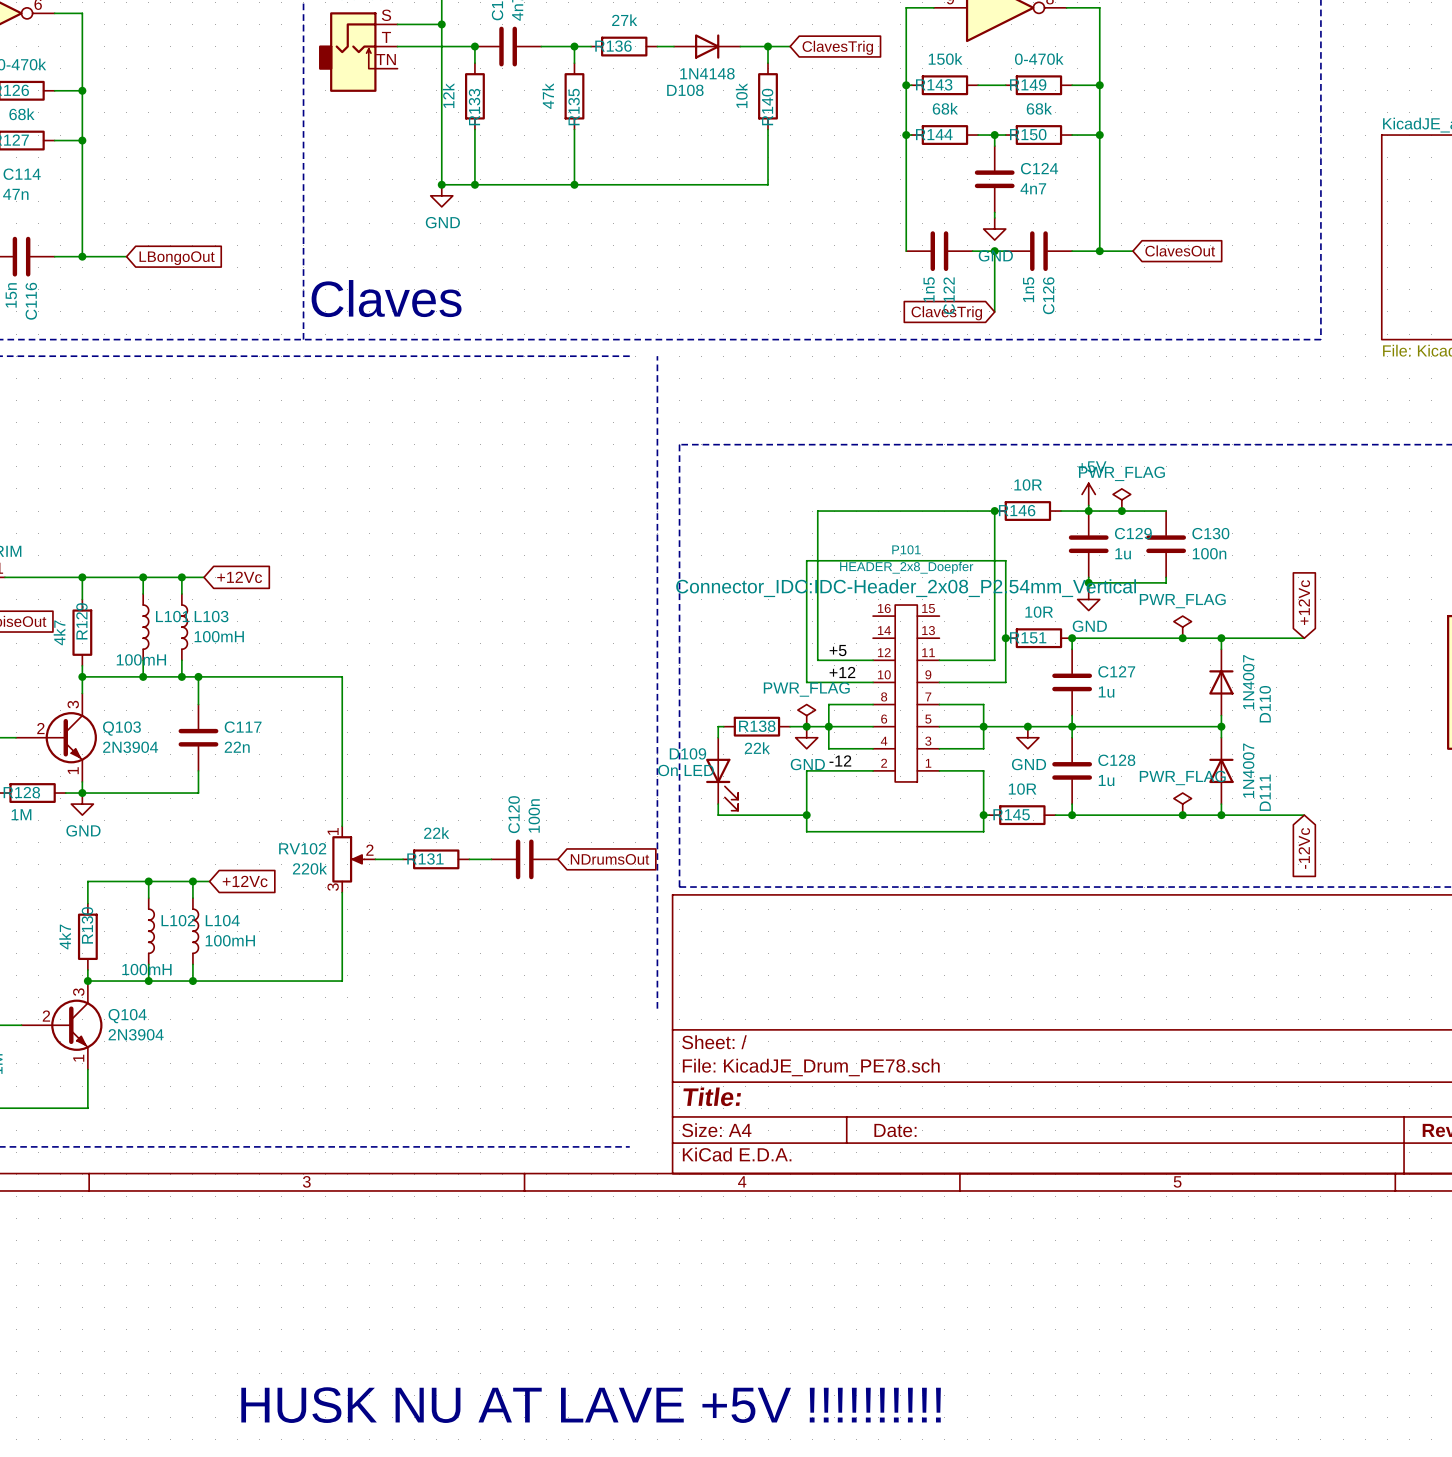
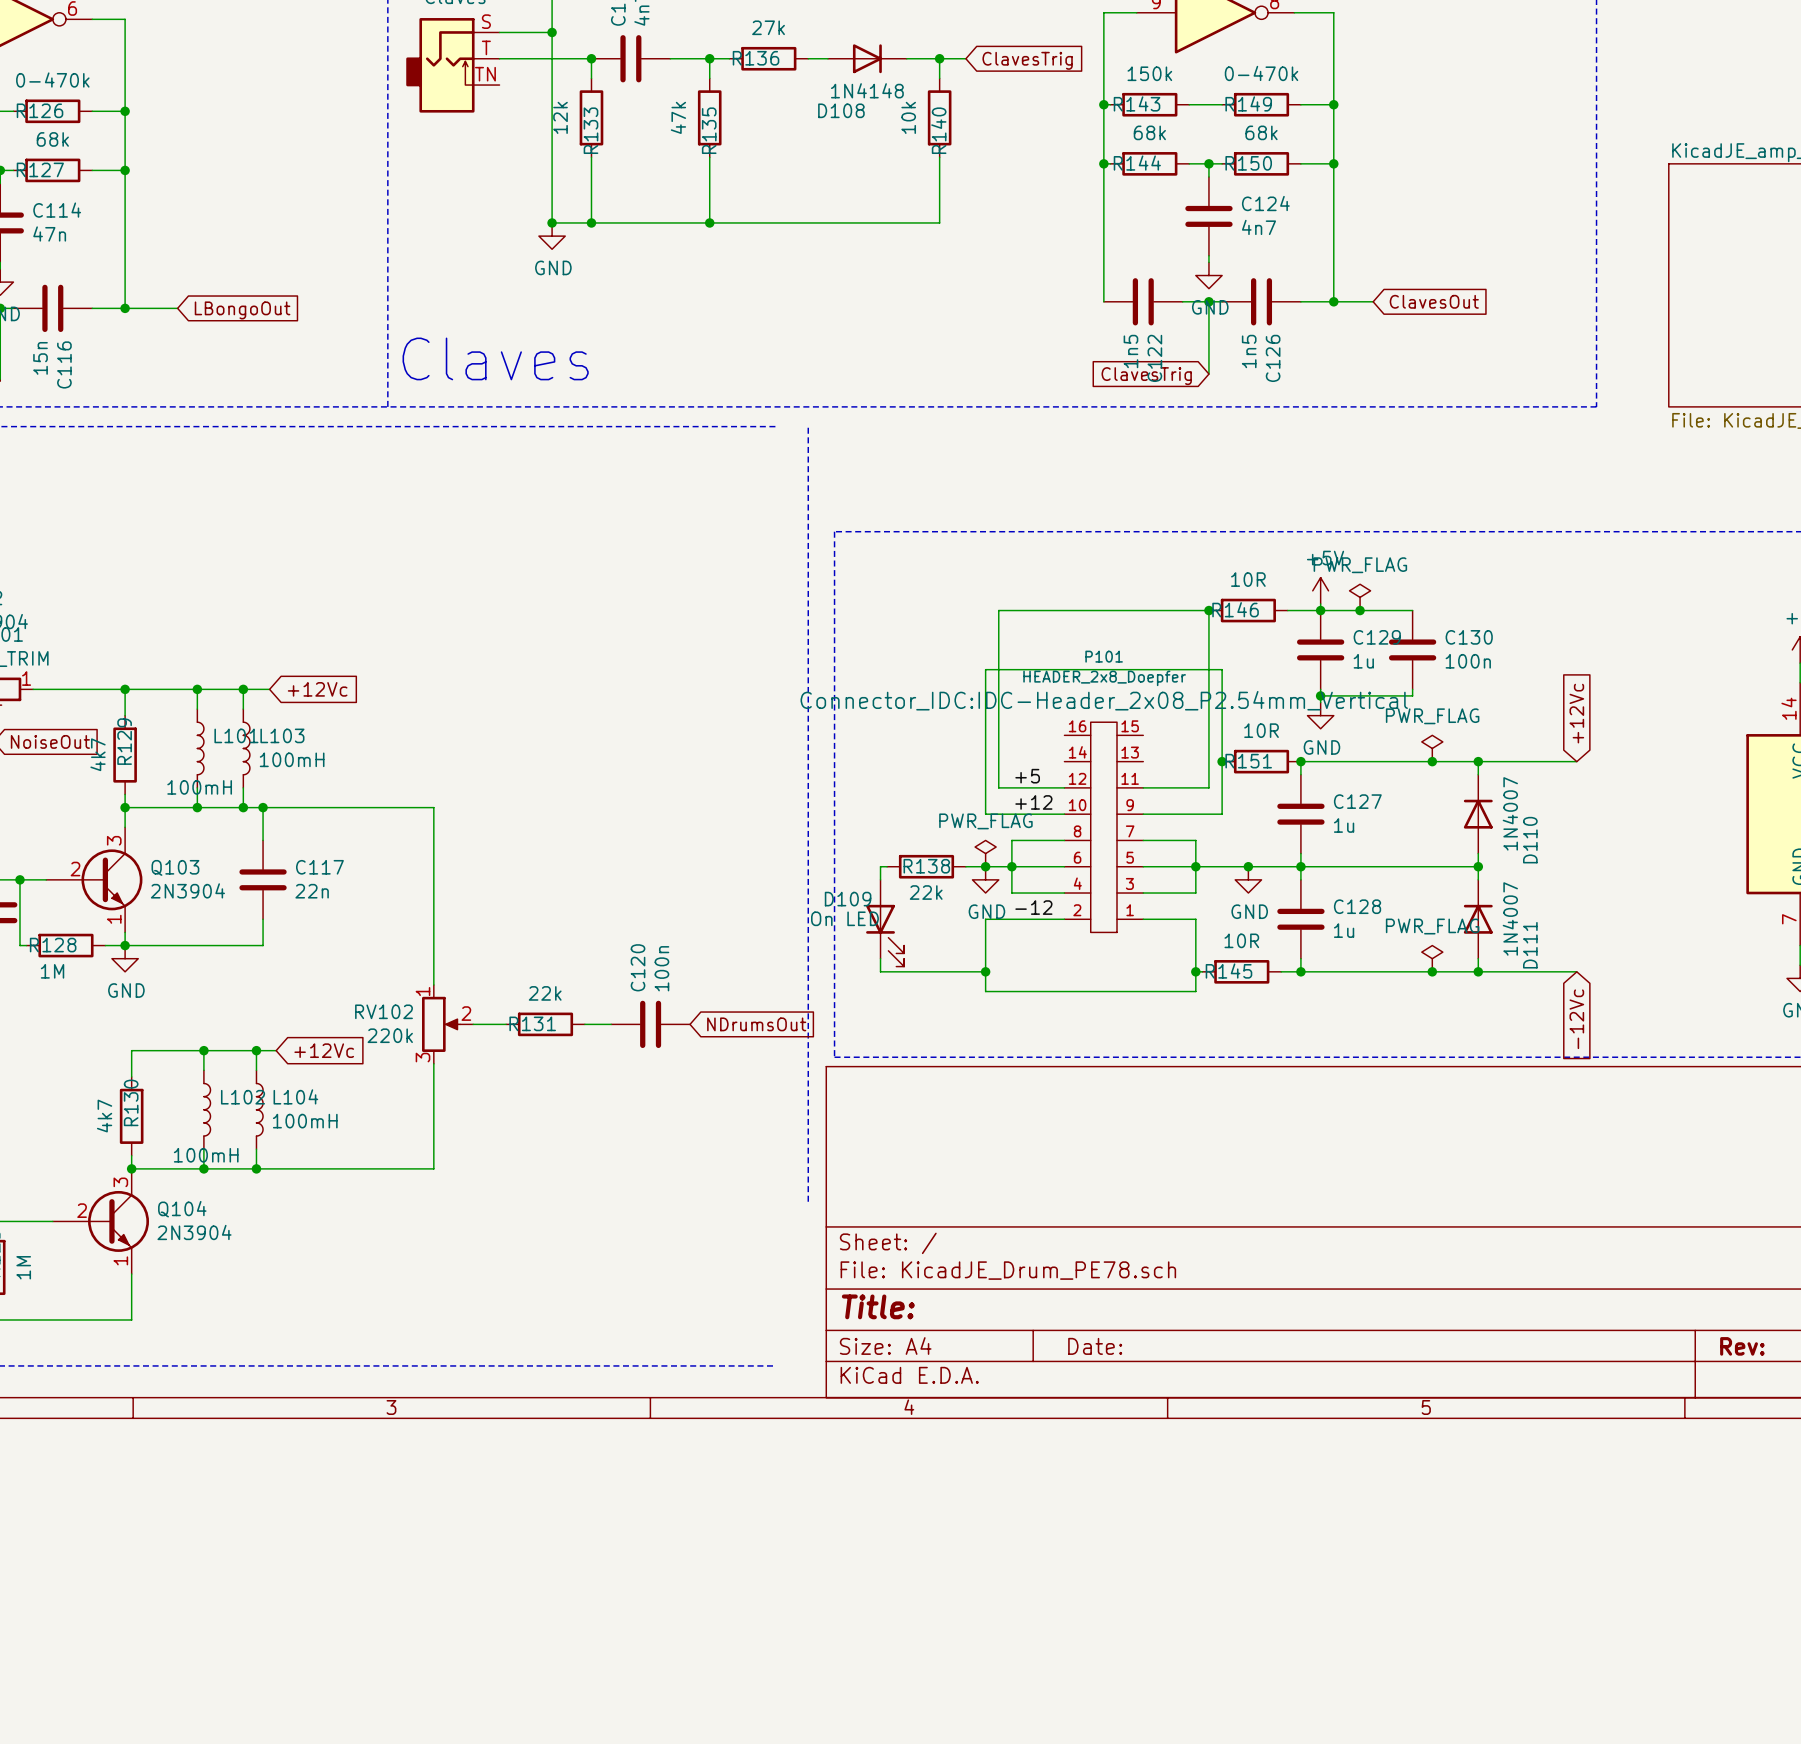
text: HUSK NU AT LAVE +5V !!!!!!!!!! (591, 1405) -> none

